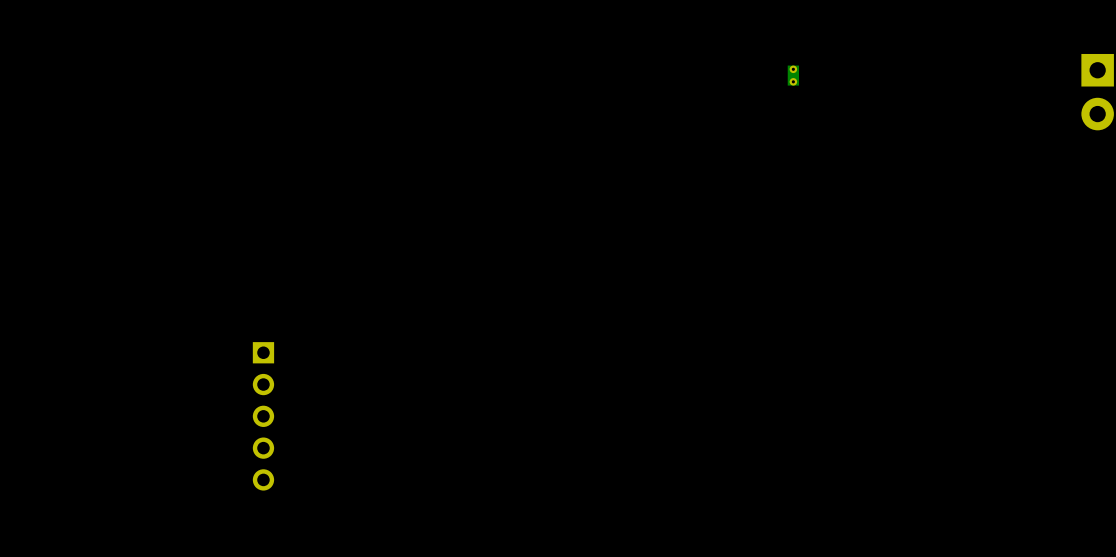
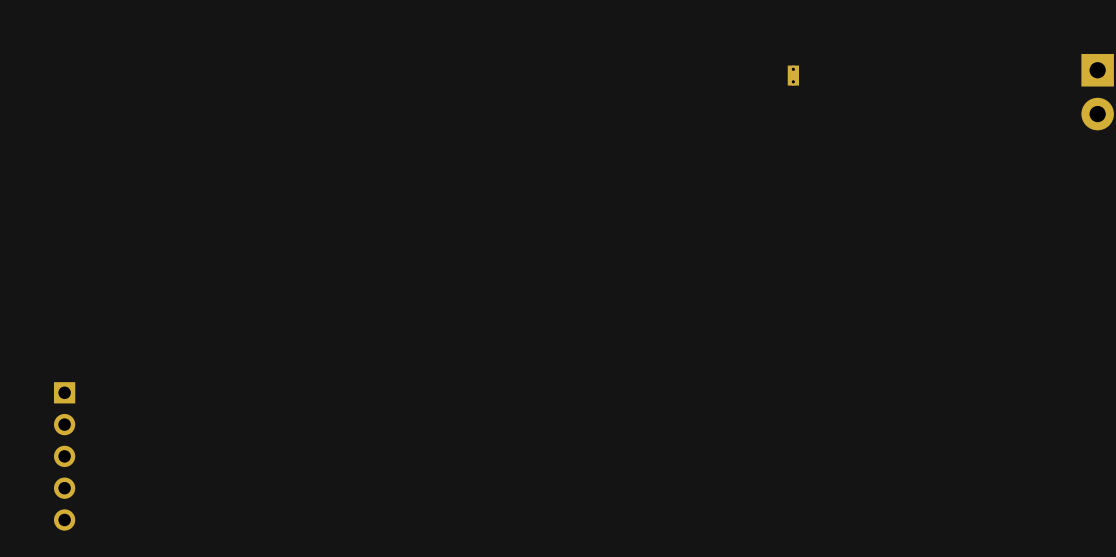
part position: (263, 416) -> (64, 456)

